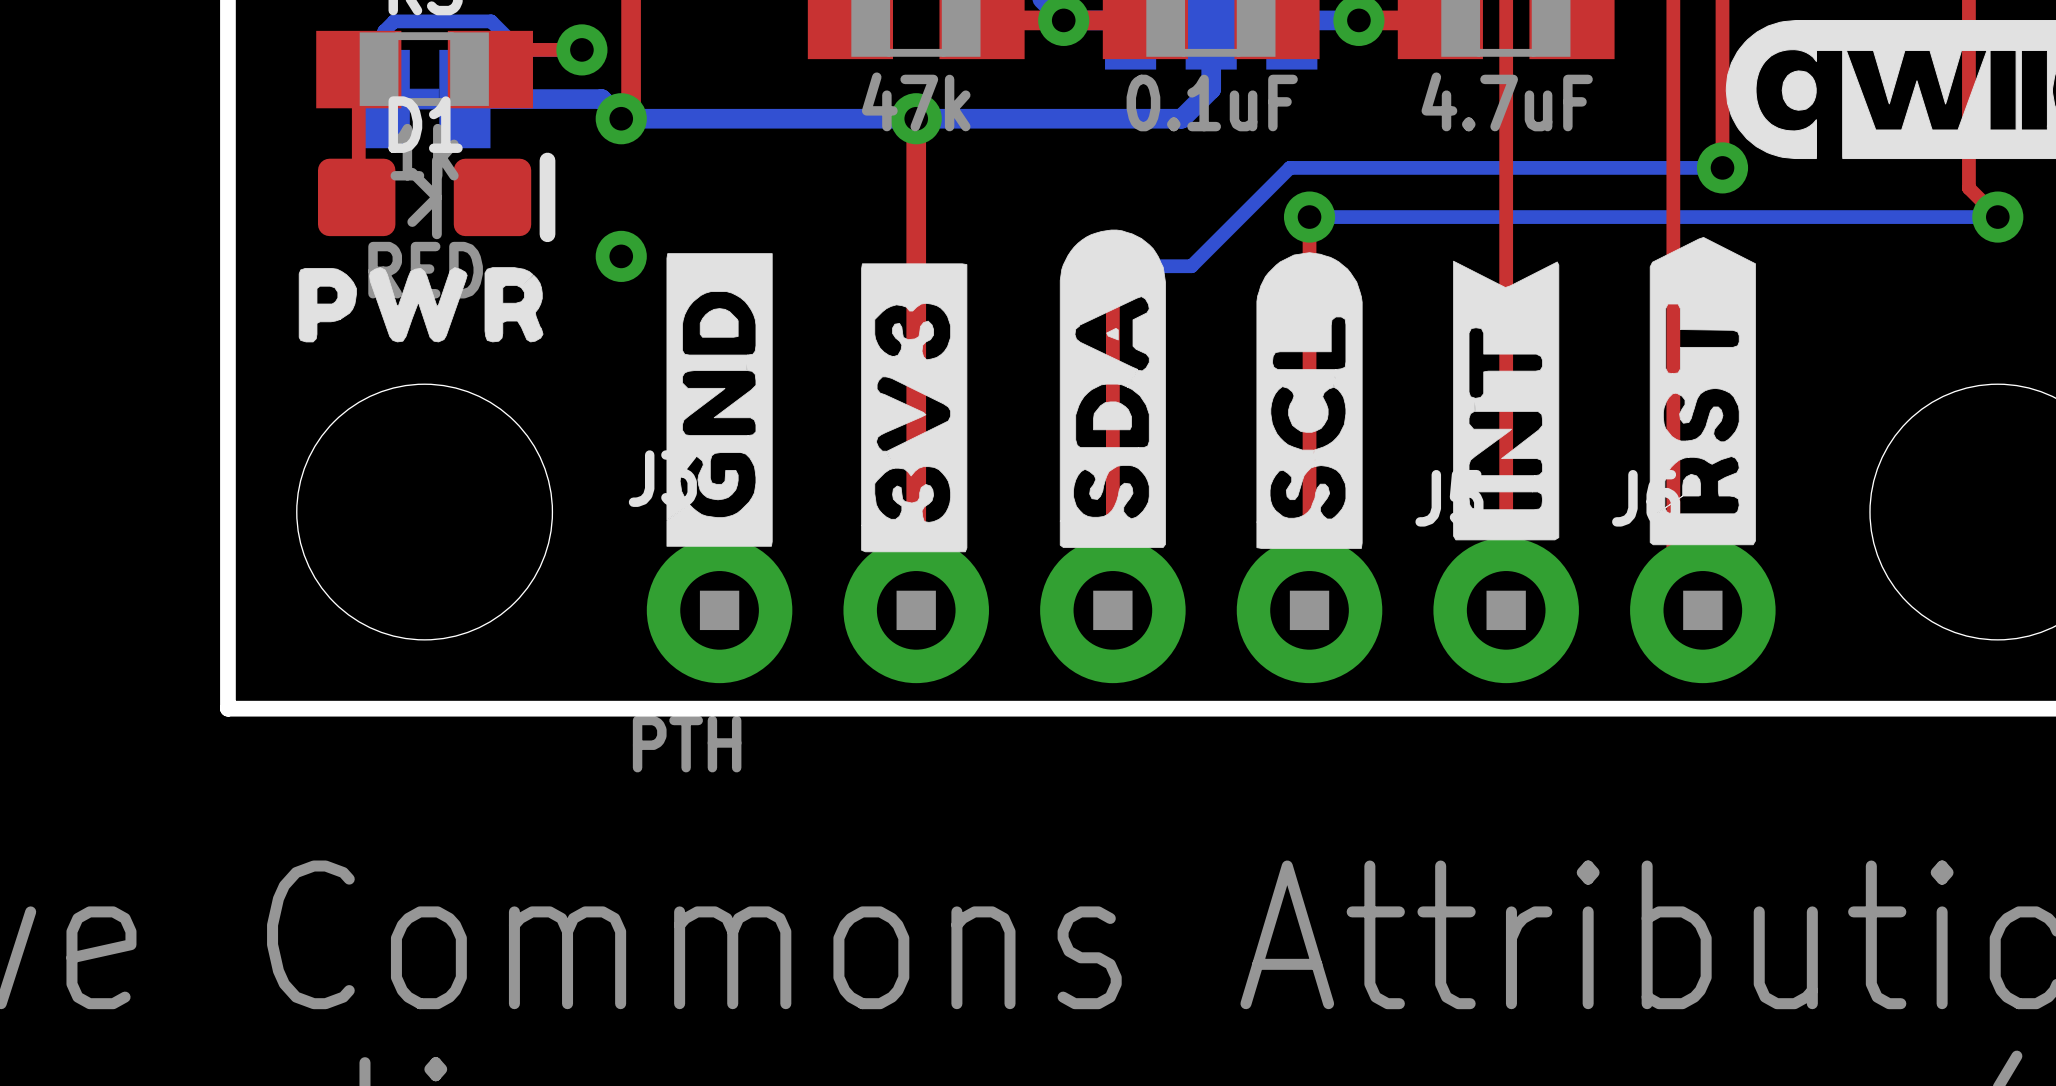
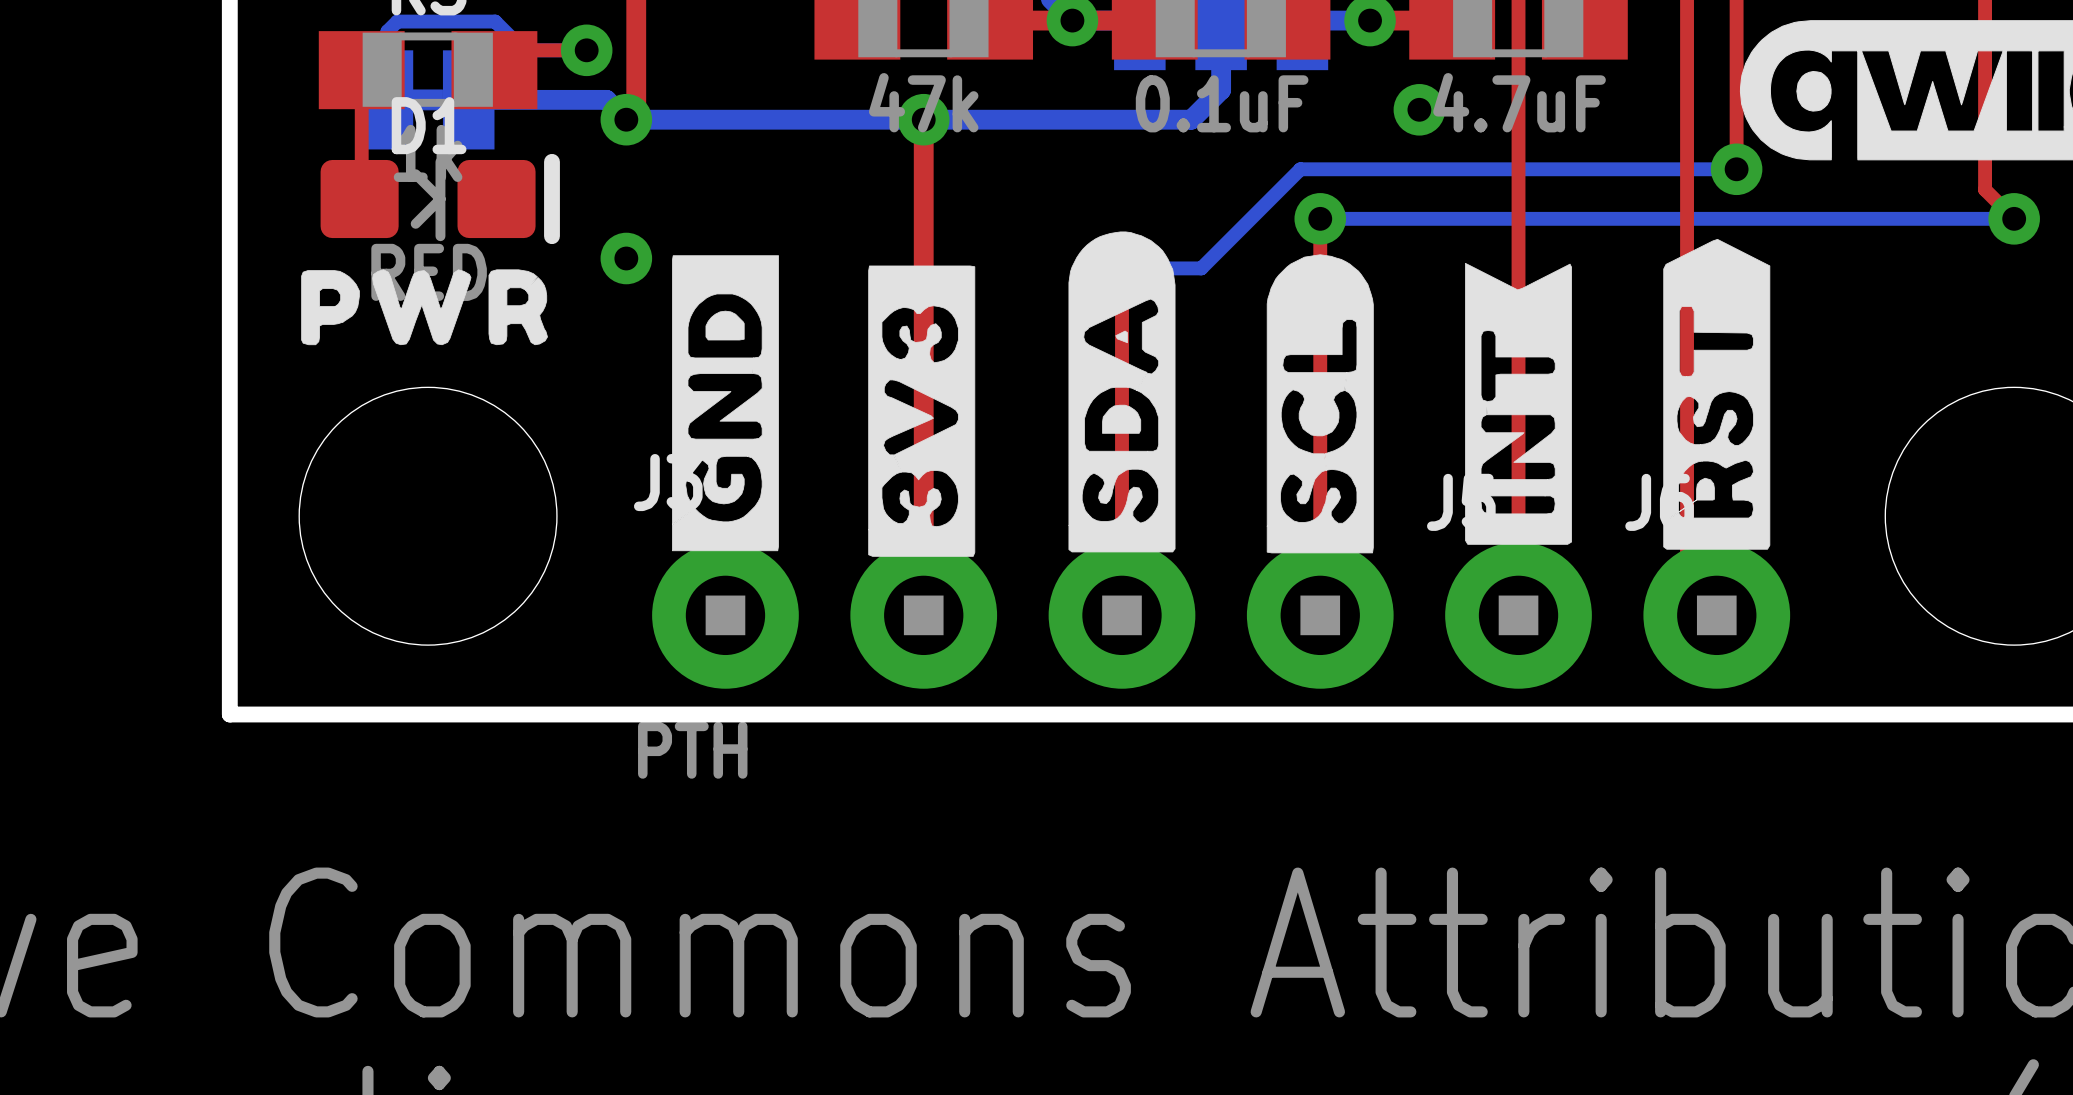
via: none -> (1419, 109)

